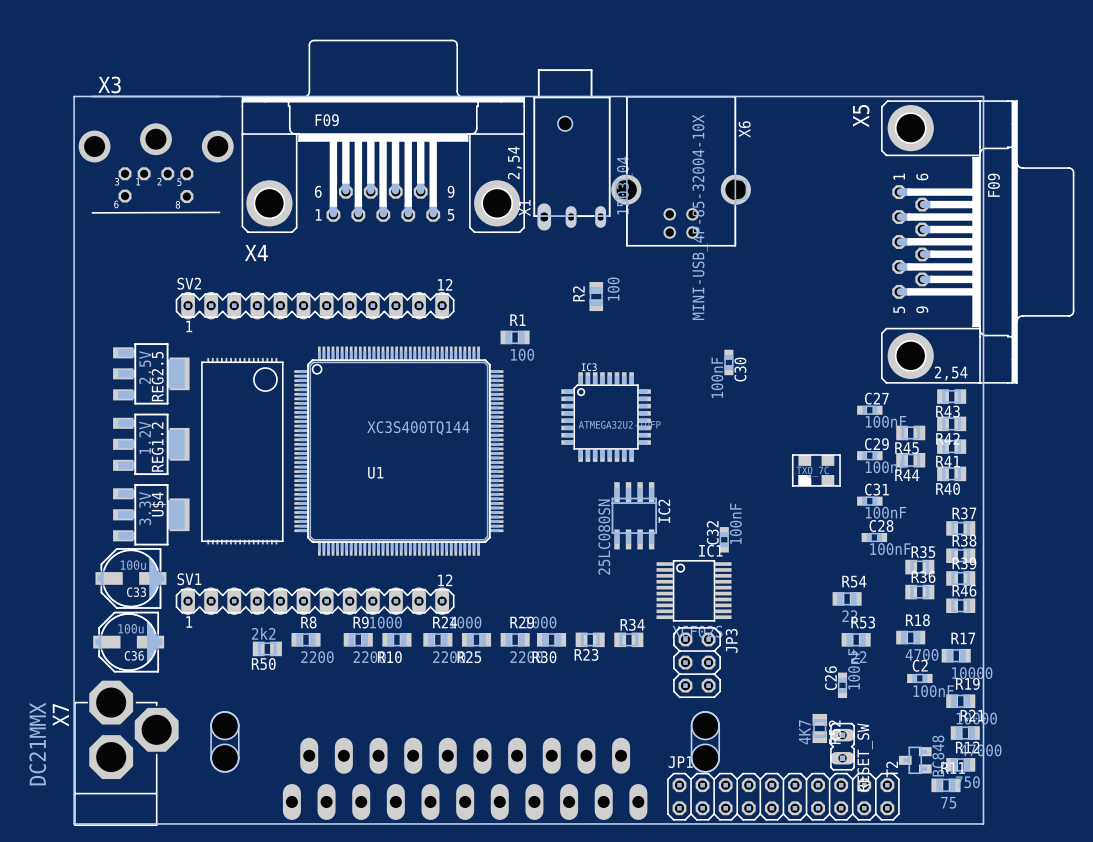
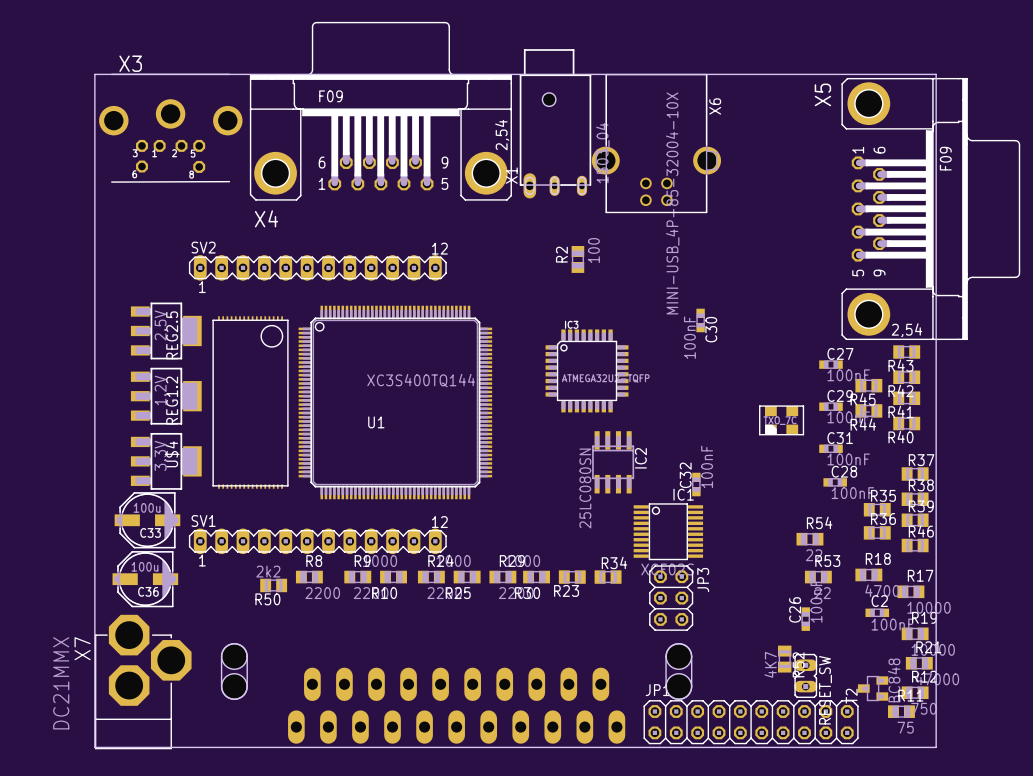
R1: 100 (515, 337) -> none

